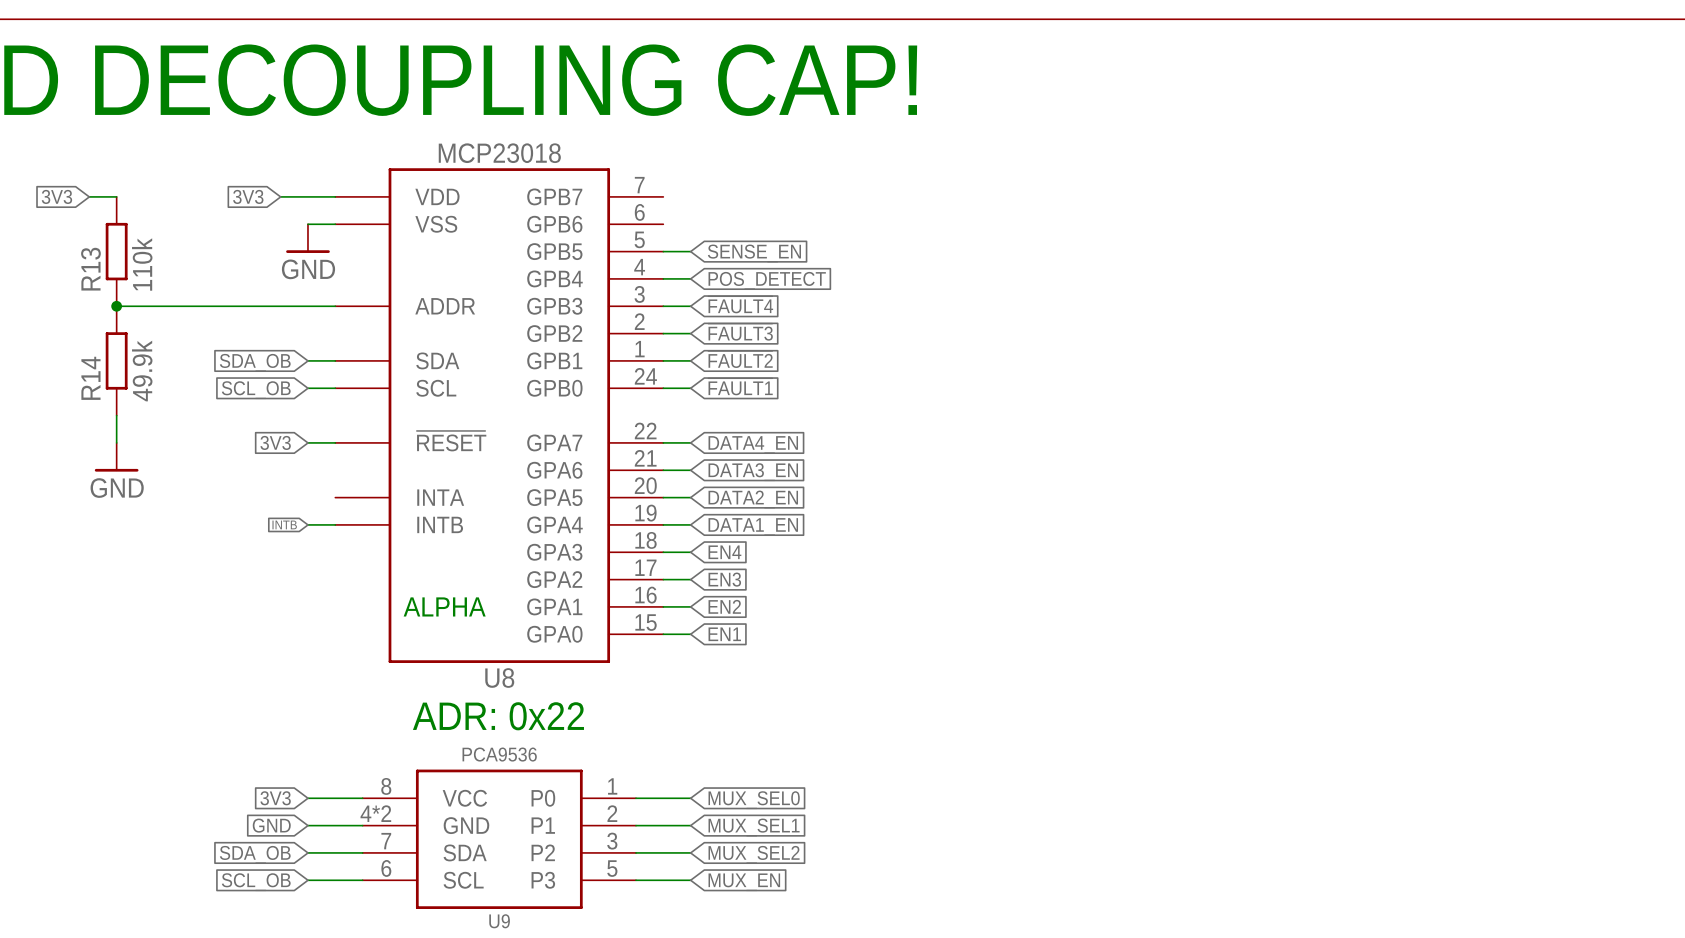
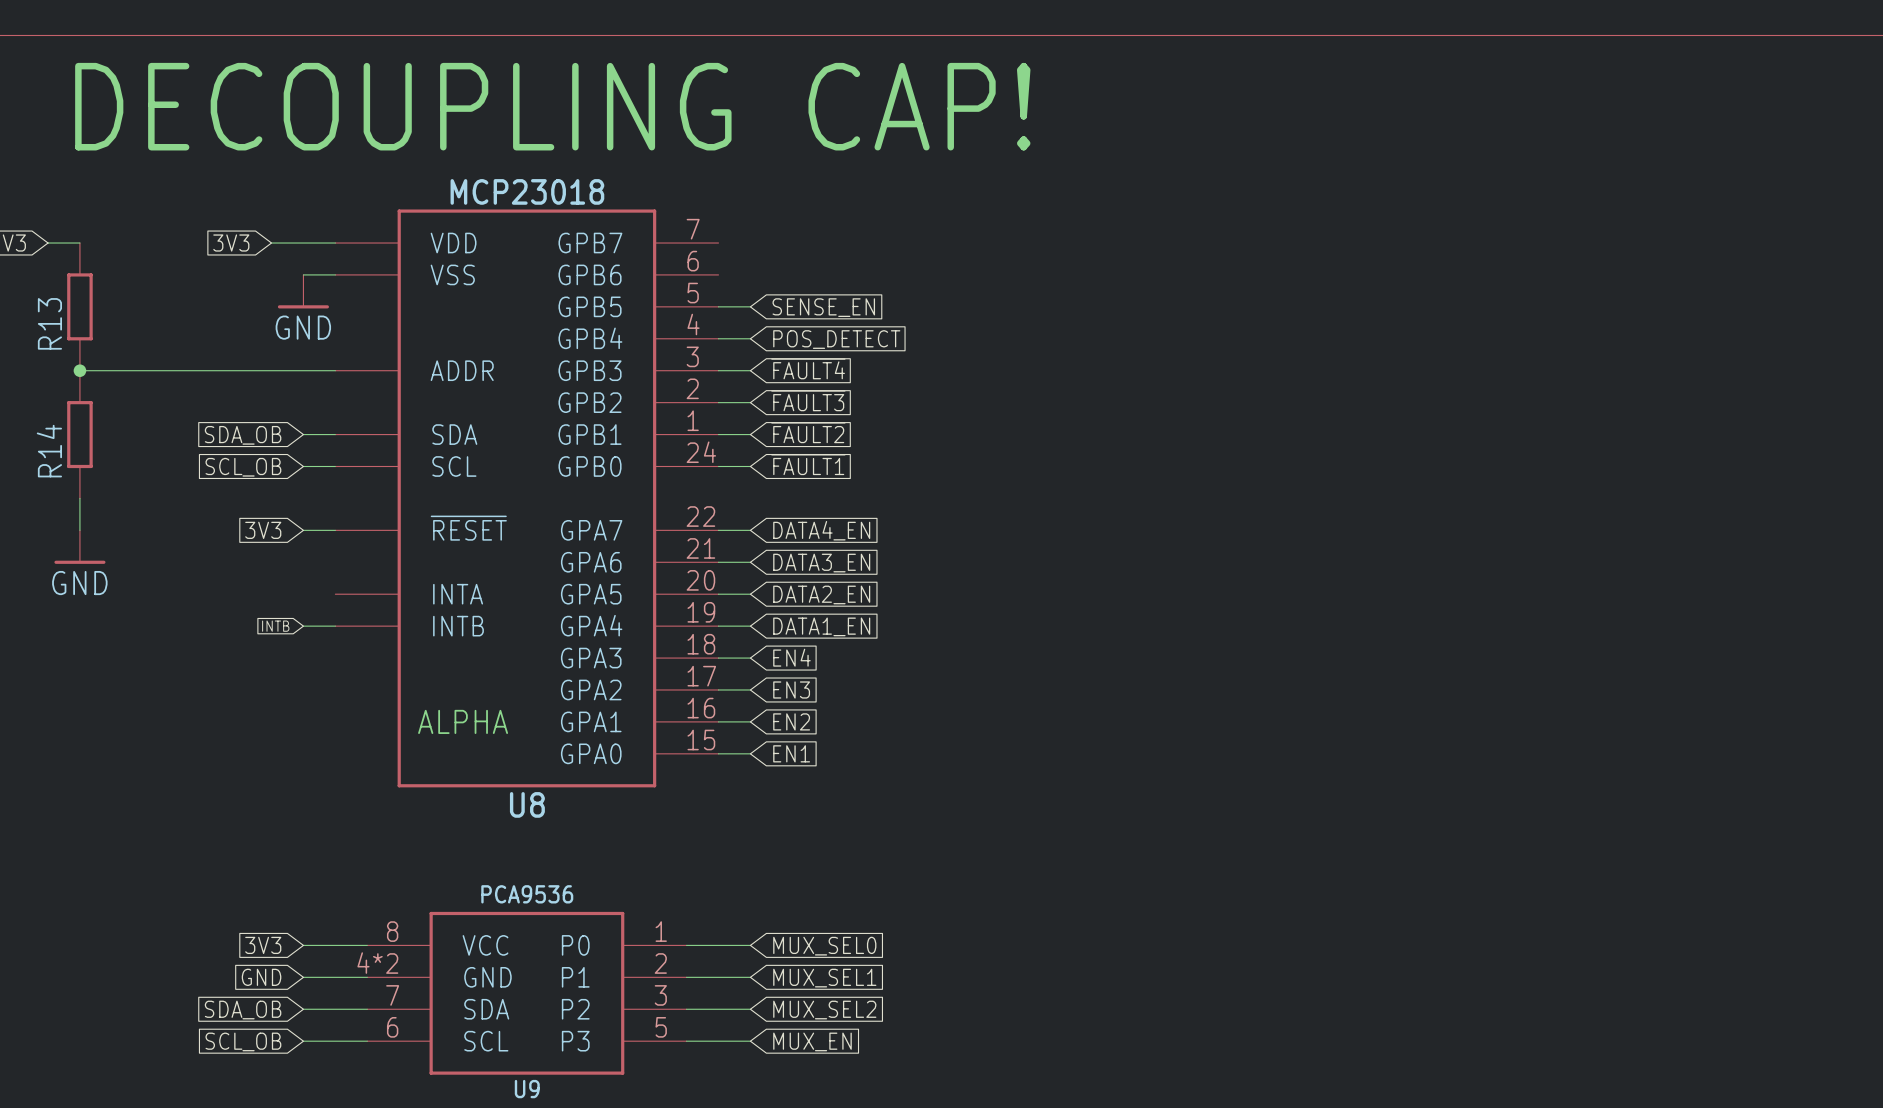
R13 value: 110k (142, 264) -> none
R14 value: 49.9k (142, 371) -> none
text: ADR: 0x22 (498, 716) -> none

